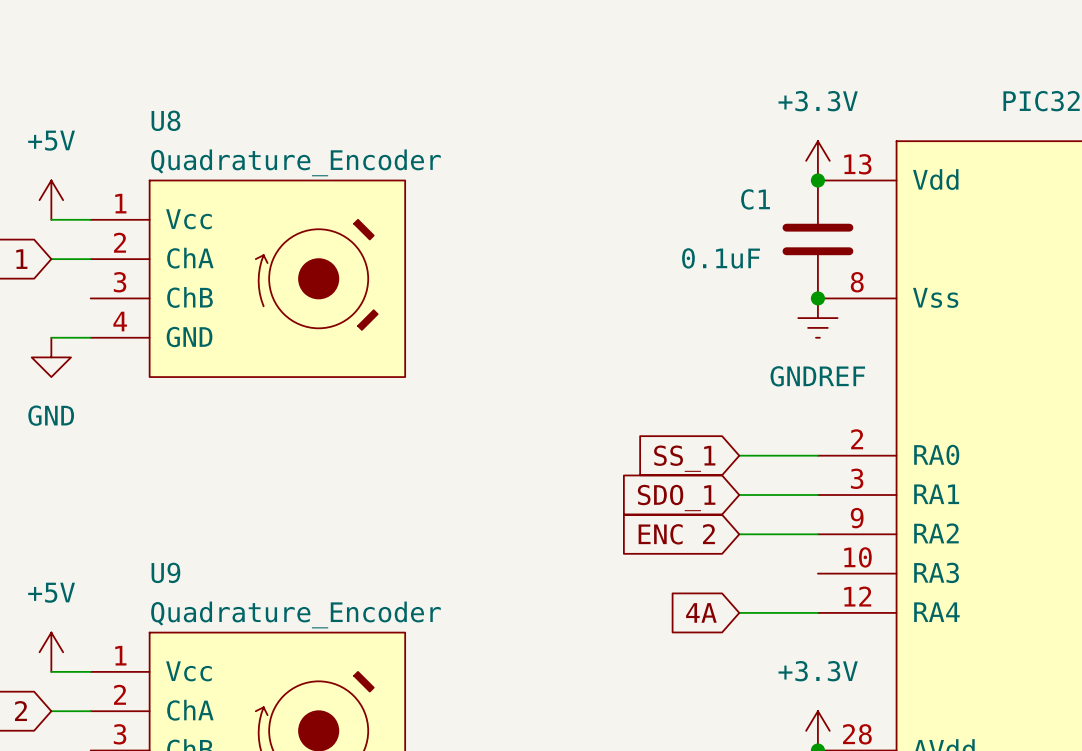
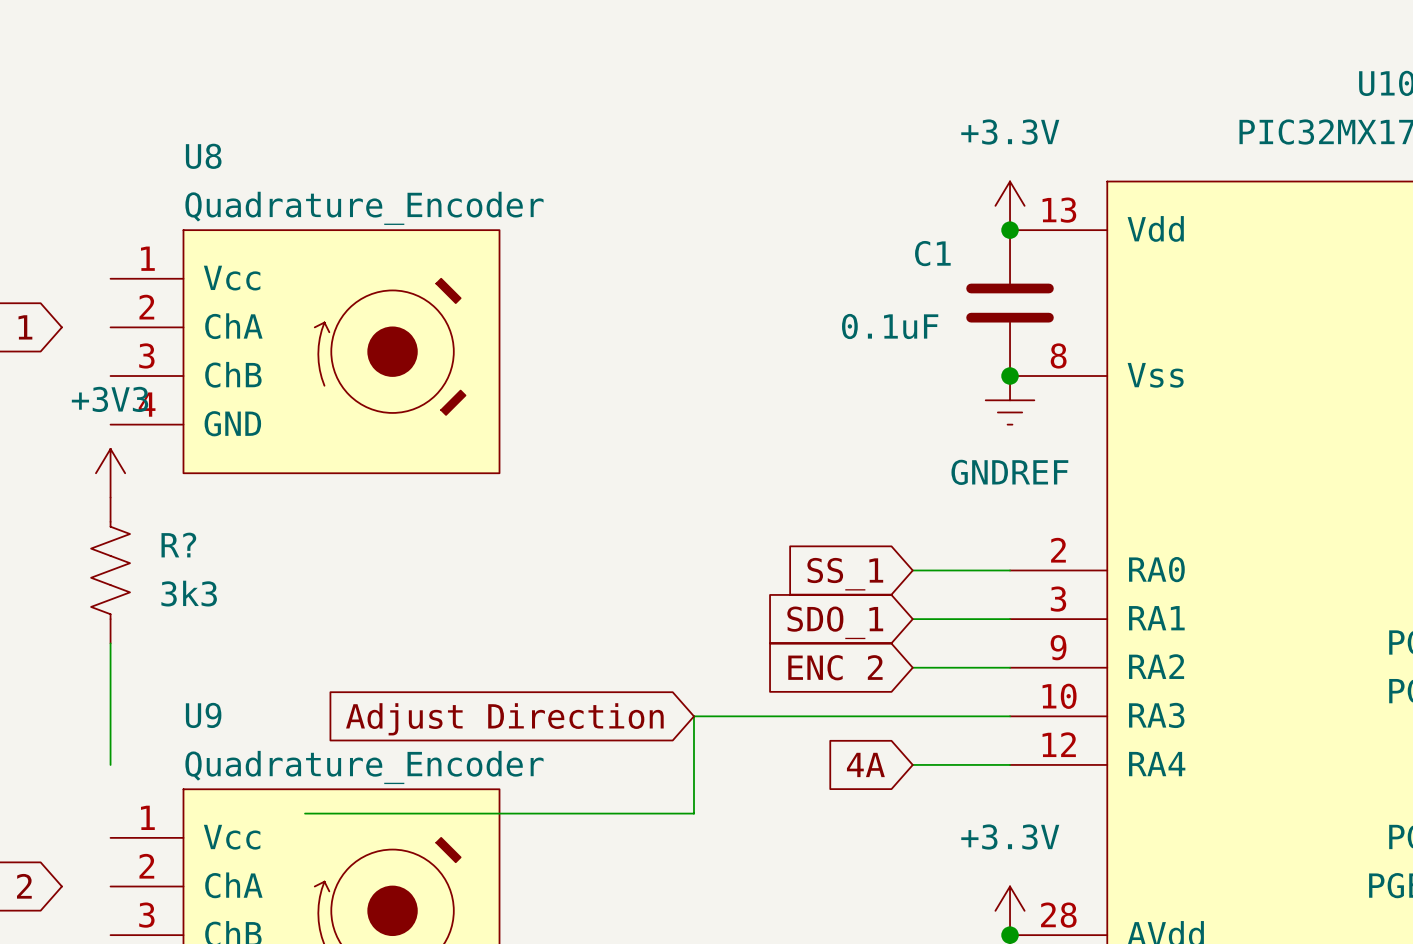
power symbol: +5V (51, 200) -> none
wire: (51, 219) (90, 219) -> none
wire: (51, 259) (90, 259) -> none
wire: (51, 337) (90, 337) -> none
power symbol: GND (51, 357) -> none
power symbol: none -> +3V3 (110, 473)
R?: none -> 3k3 (110, 570)
wire: none -> (110, 643) (110, 764)
wire: none -> (1010, 716) (693, 716) (693, 813) (305, 813)
global label: none -> Adjust Direction (504, 719)
power symbol: +5V (51, 652) -> none
wire: (51, 671) (90, 671) -> none
wire: (51, 711) (90, 711) -> none

